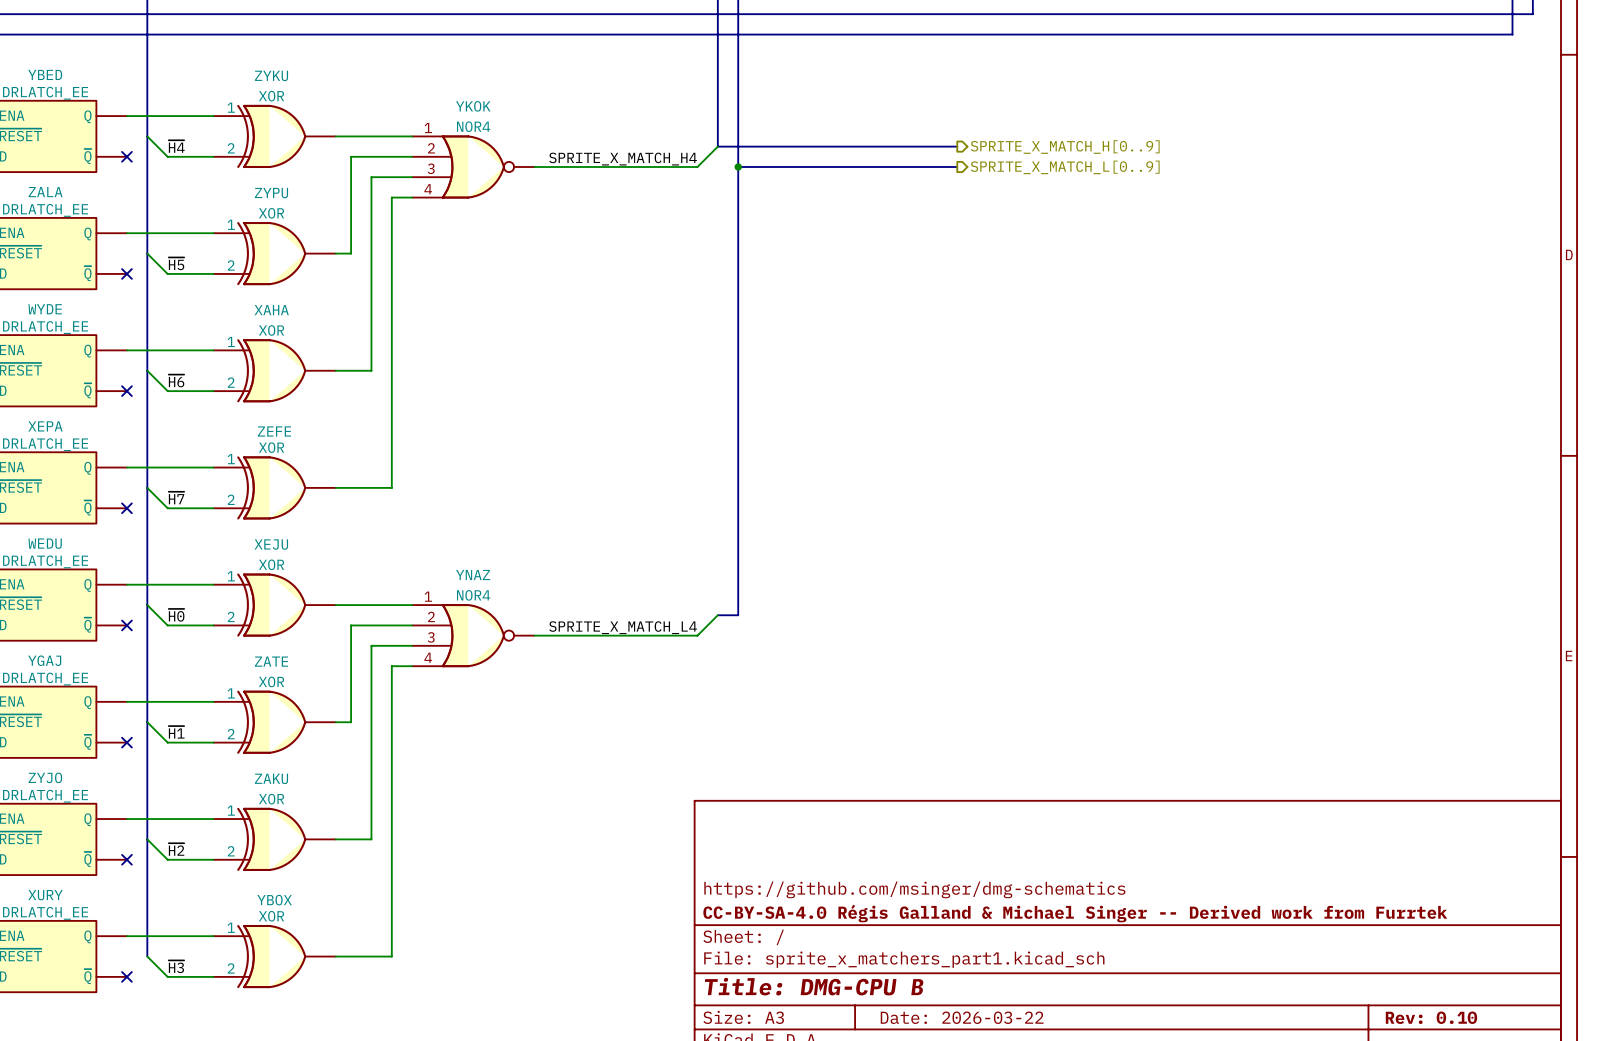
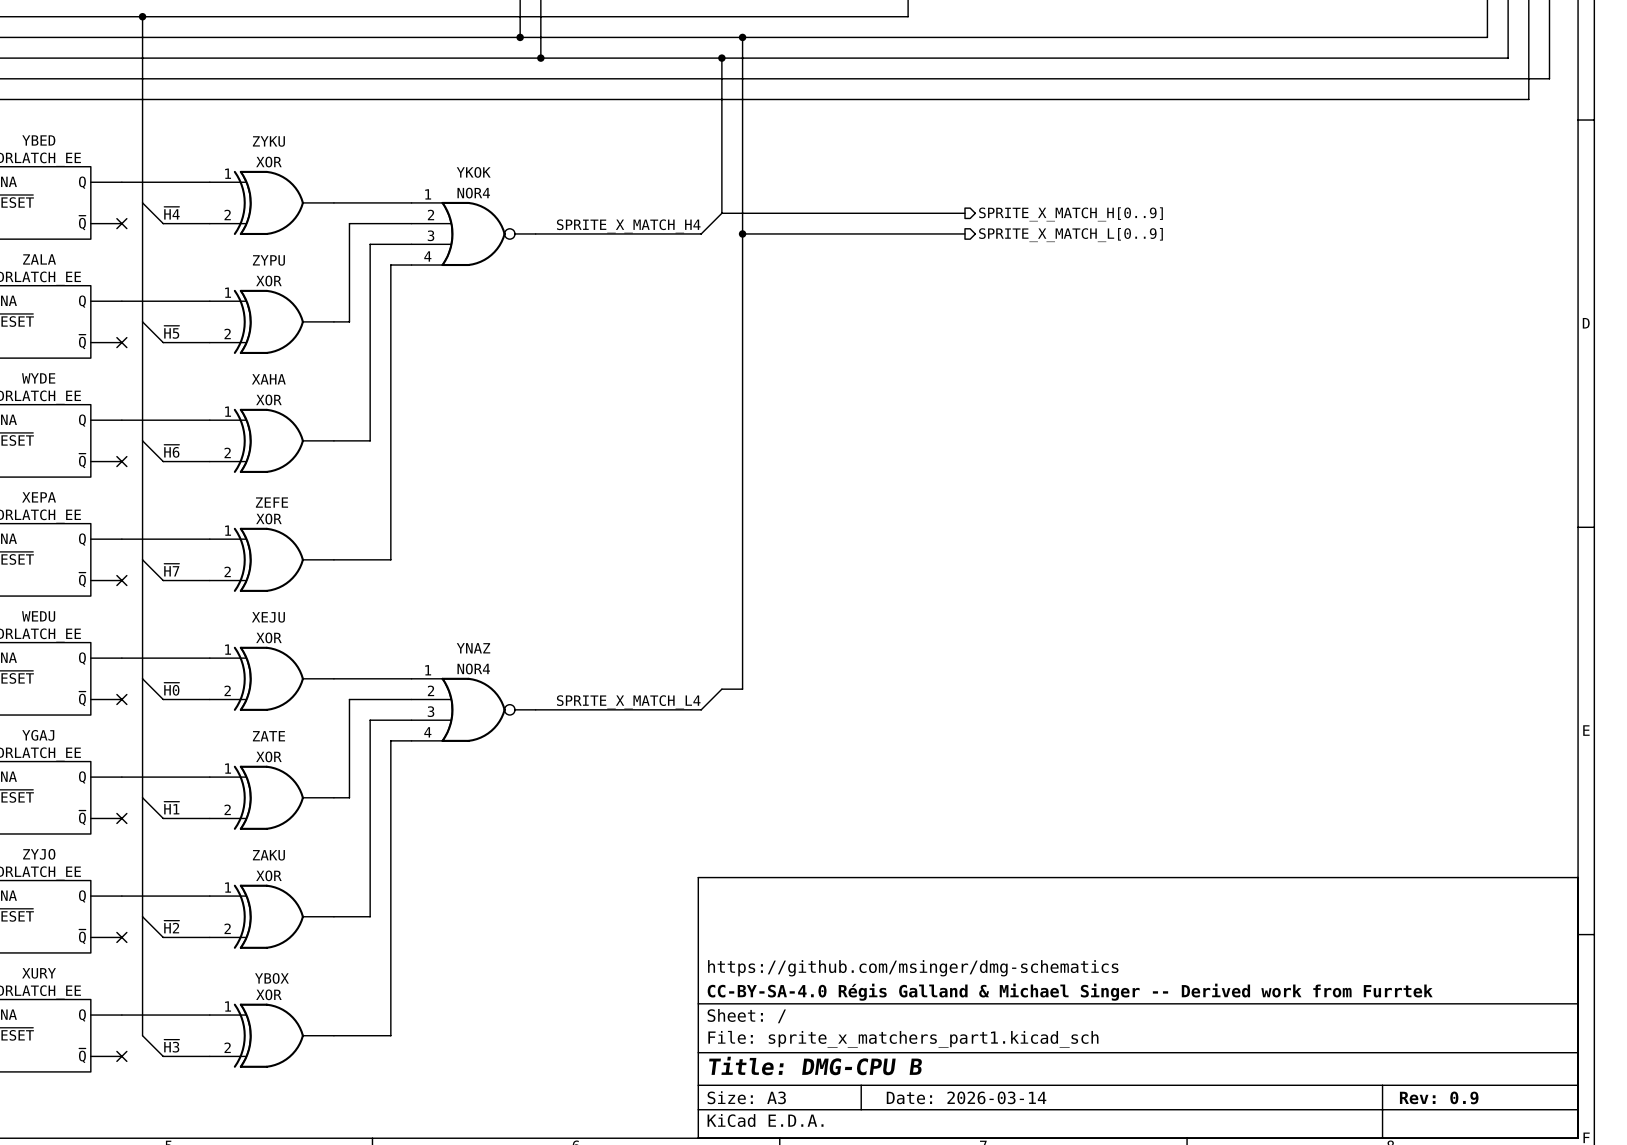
title block: Date: 2026-03-22 (962, 1017) -> Date: 2026-03-14 (966, 1097)
title block: Rev: 0.10 (1431, 1017) -> Rev: 0.9 (1439, 1097)

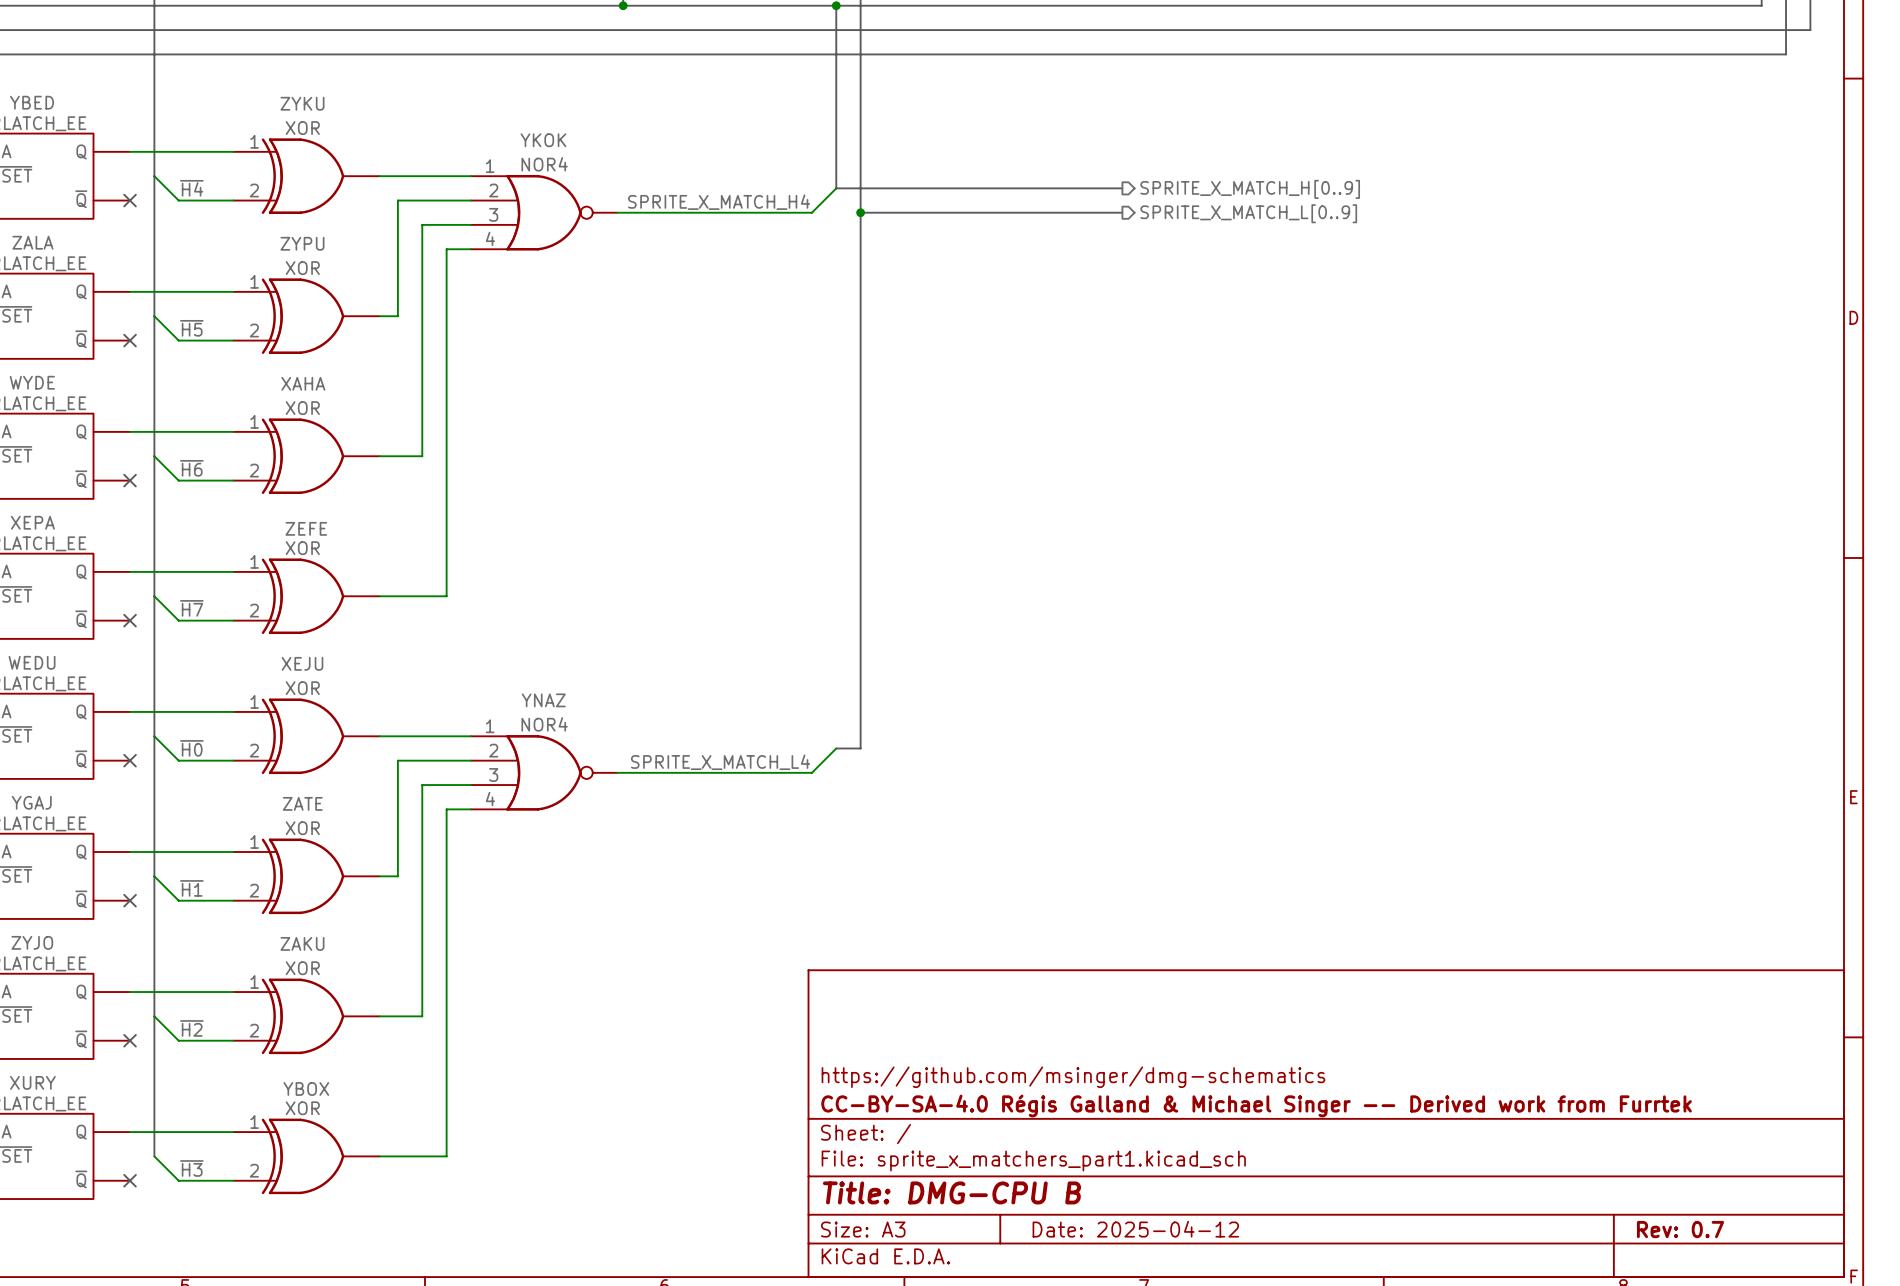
title block: Date: 2026-03-14 (966, 1097) -> Date: 2025-04-12 (1135, 1229)
title block: Rev: 0.9 (1439, 1097) -> Rev: 0.7 (1680, 1229)

